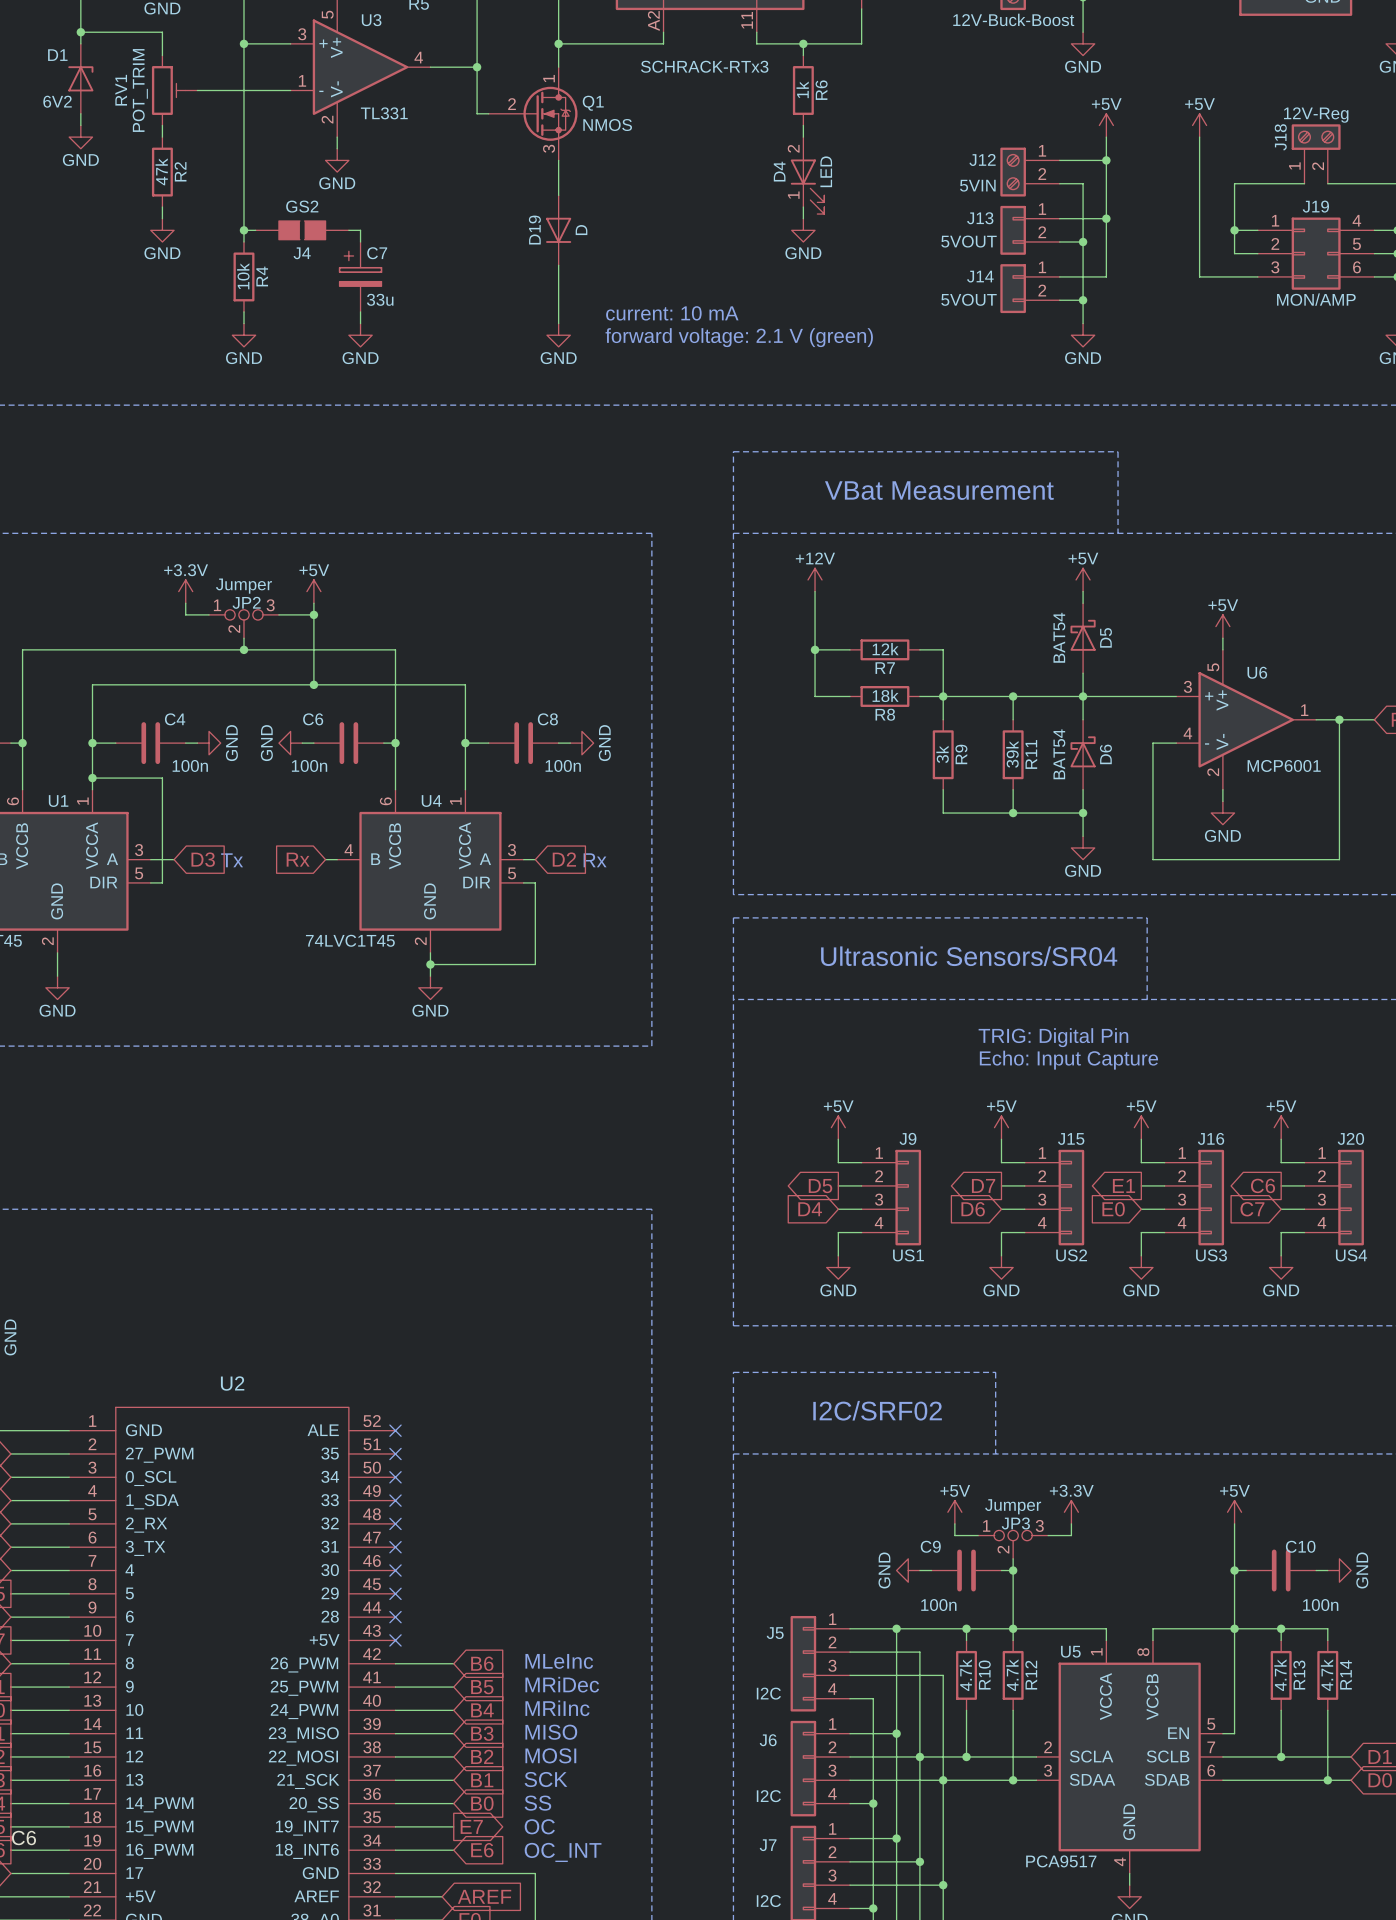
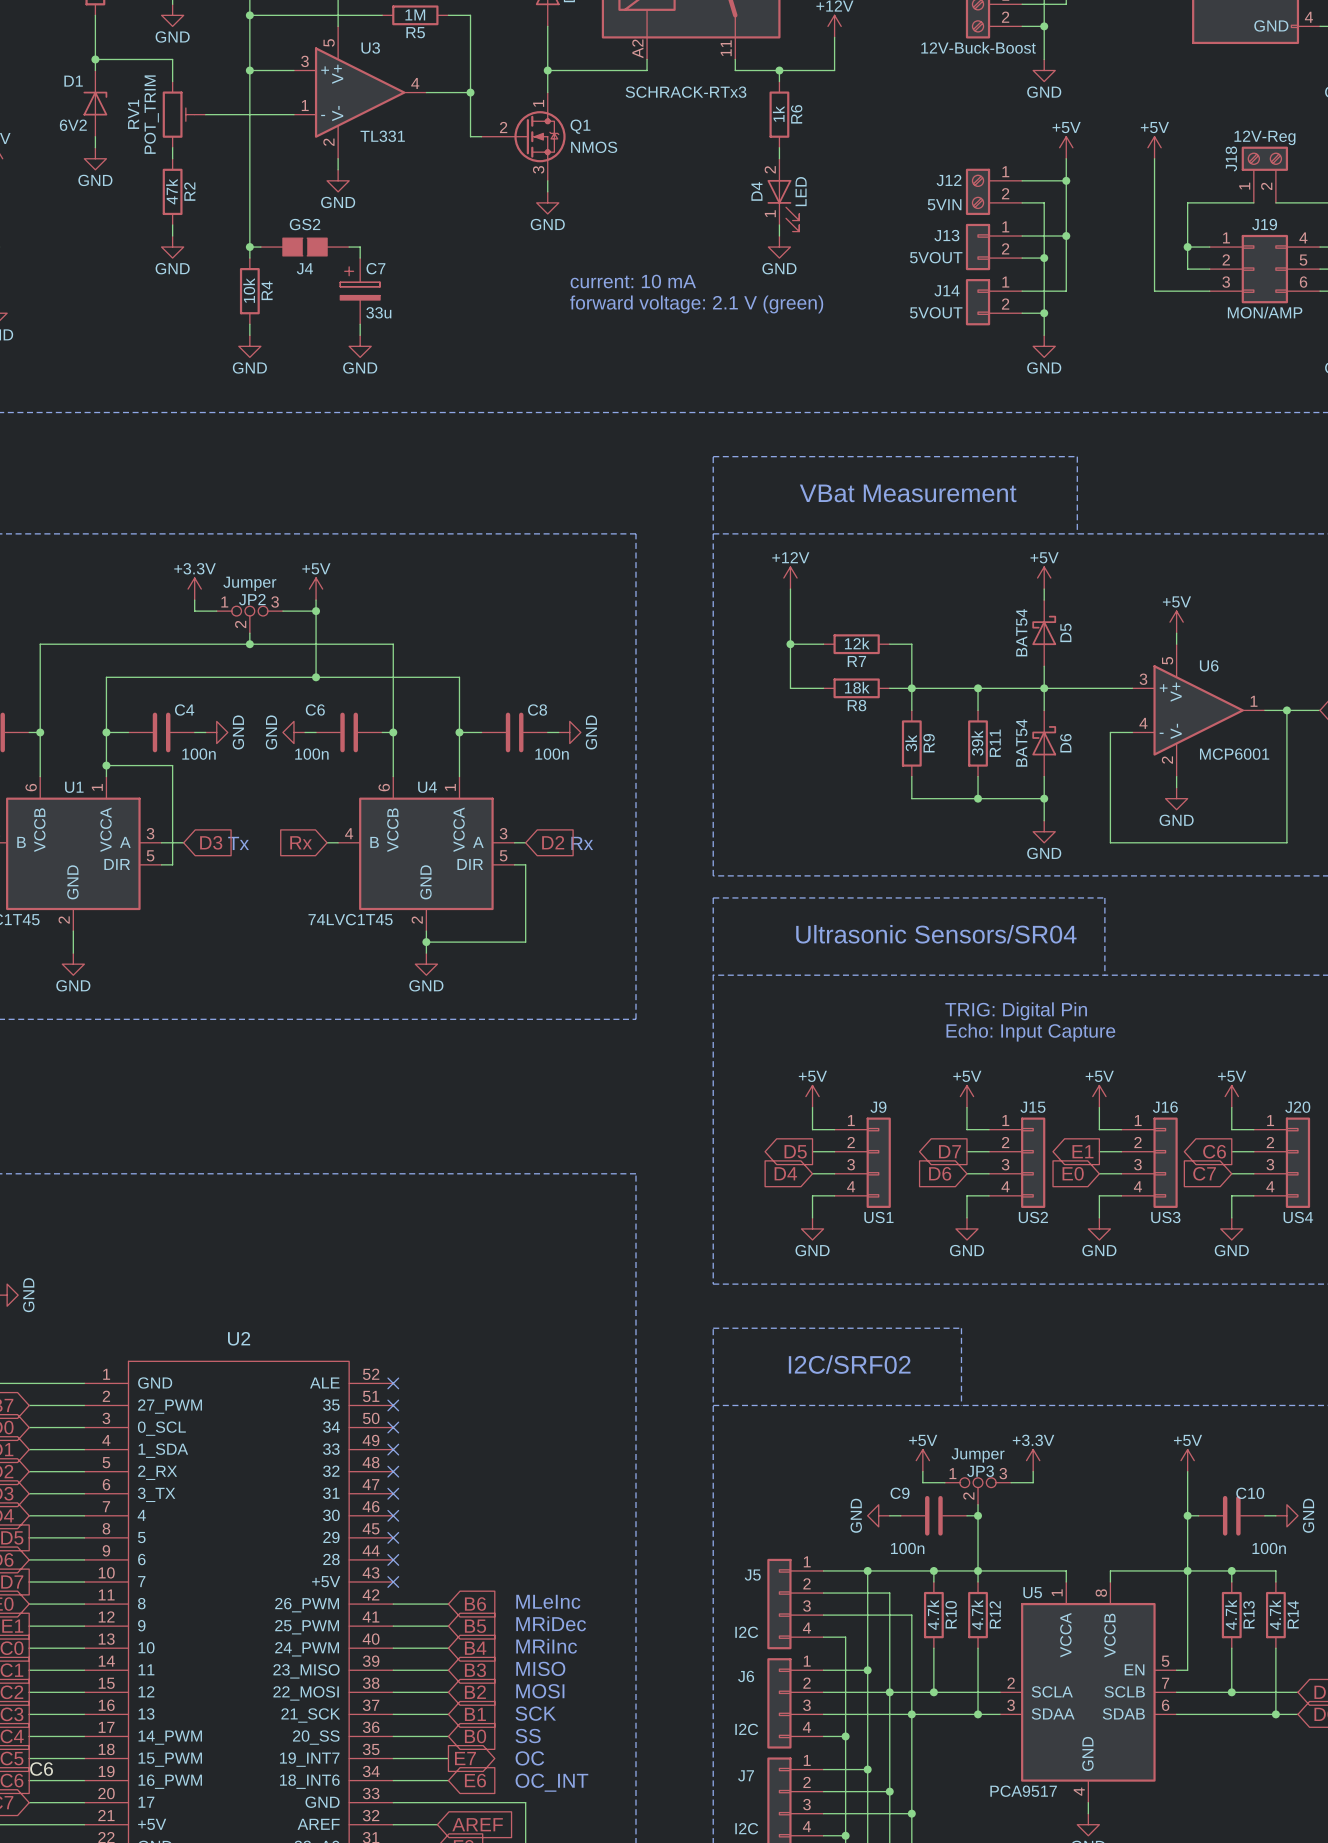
D19: D (558, 230) -> none
wire: (558, 265) (558, 323) -> none
text position: current: 10 mA (672, 313) -> current: 10 mA (633, 281)
power symbol position: GND (558, 335) -> GND (547, 202)
text position: forward voltage: 2.1 V (green) (739, 337) -> forward voltage: 2.1 V (green) (696, 304)

